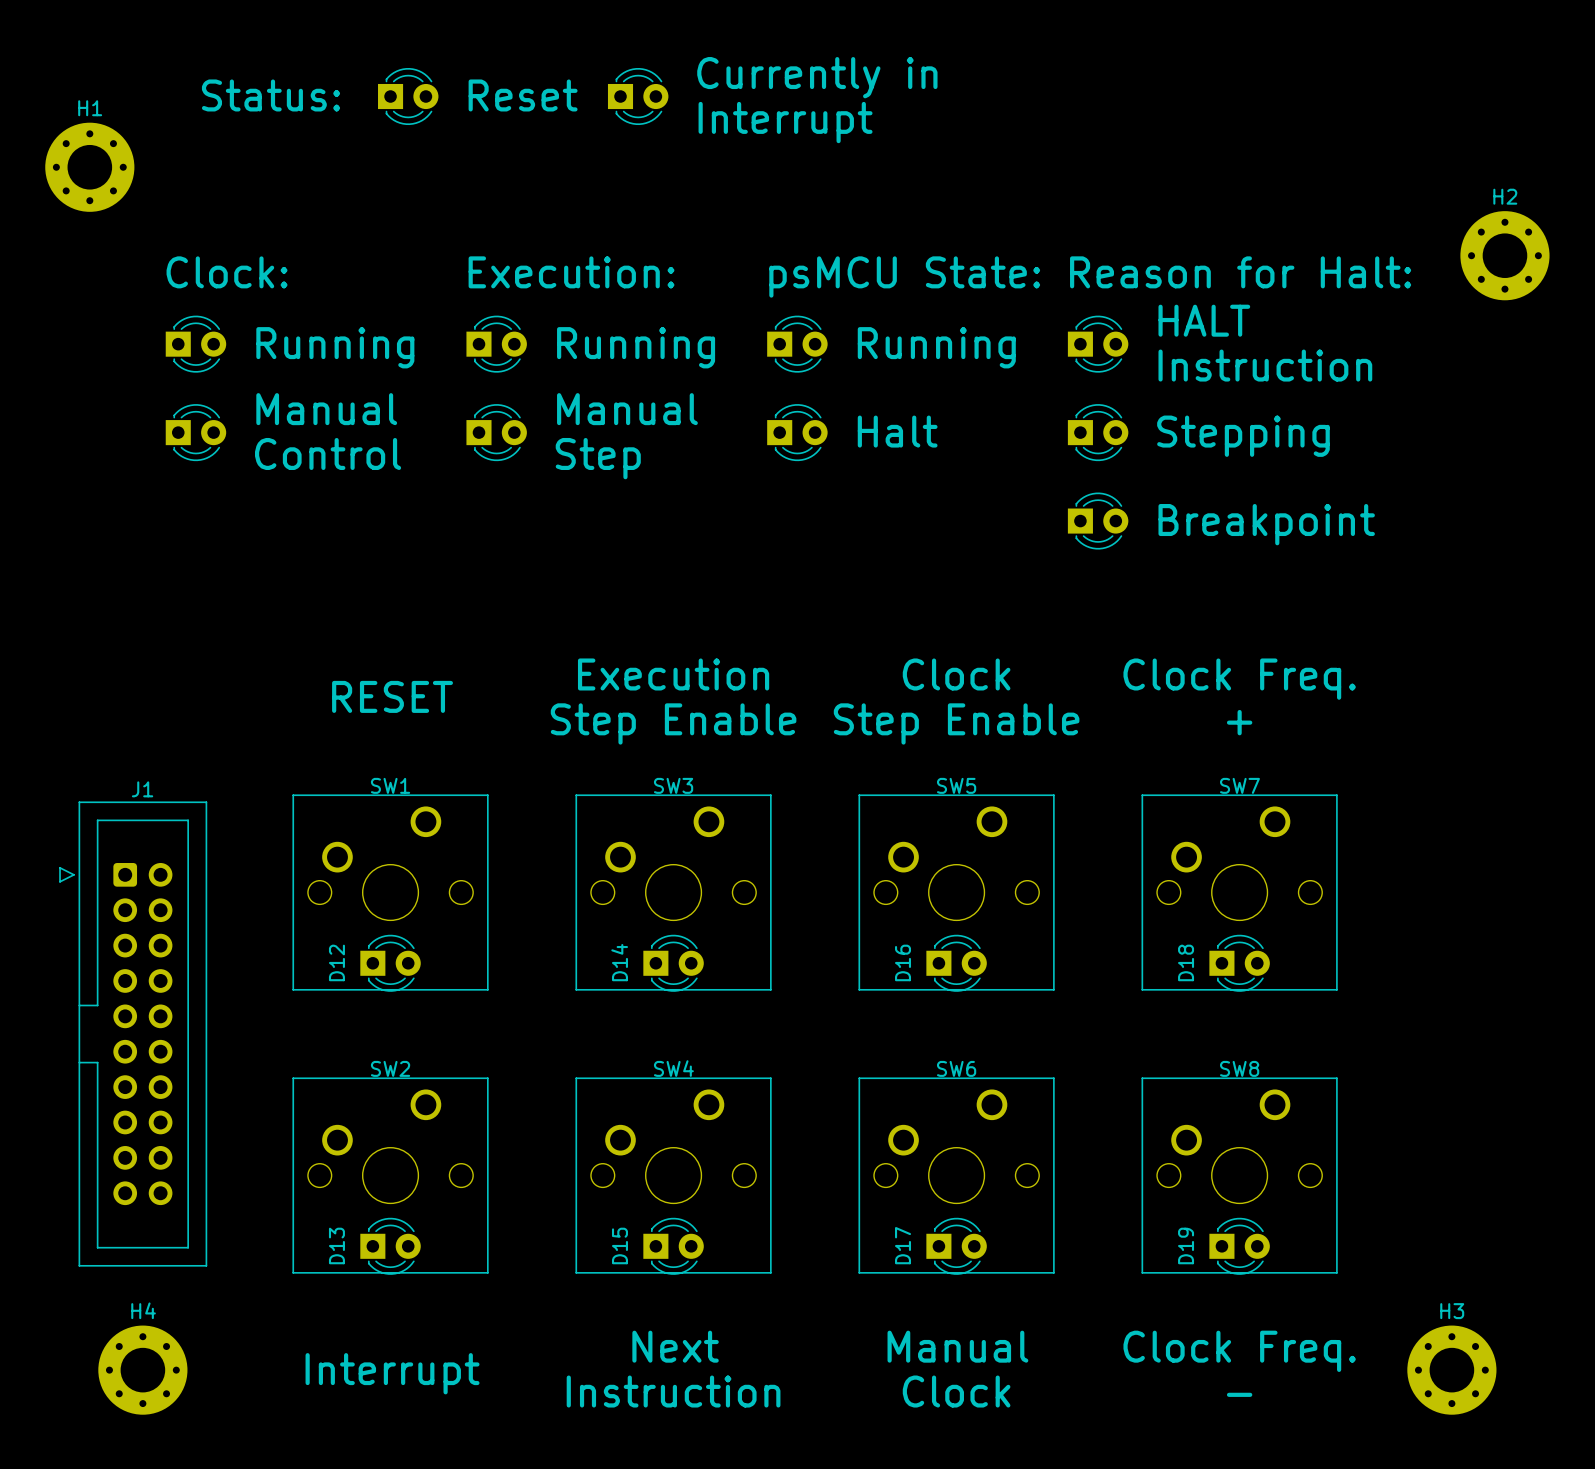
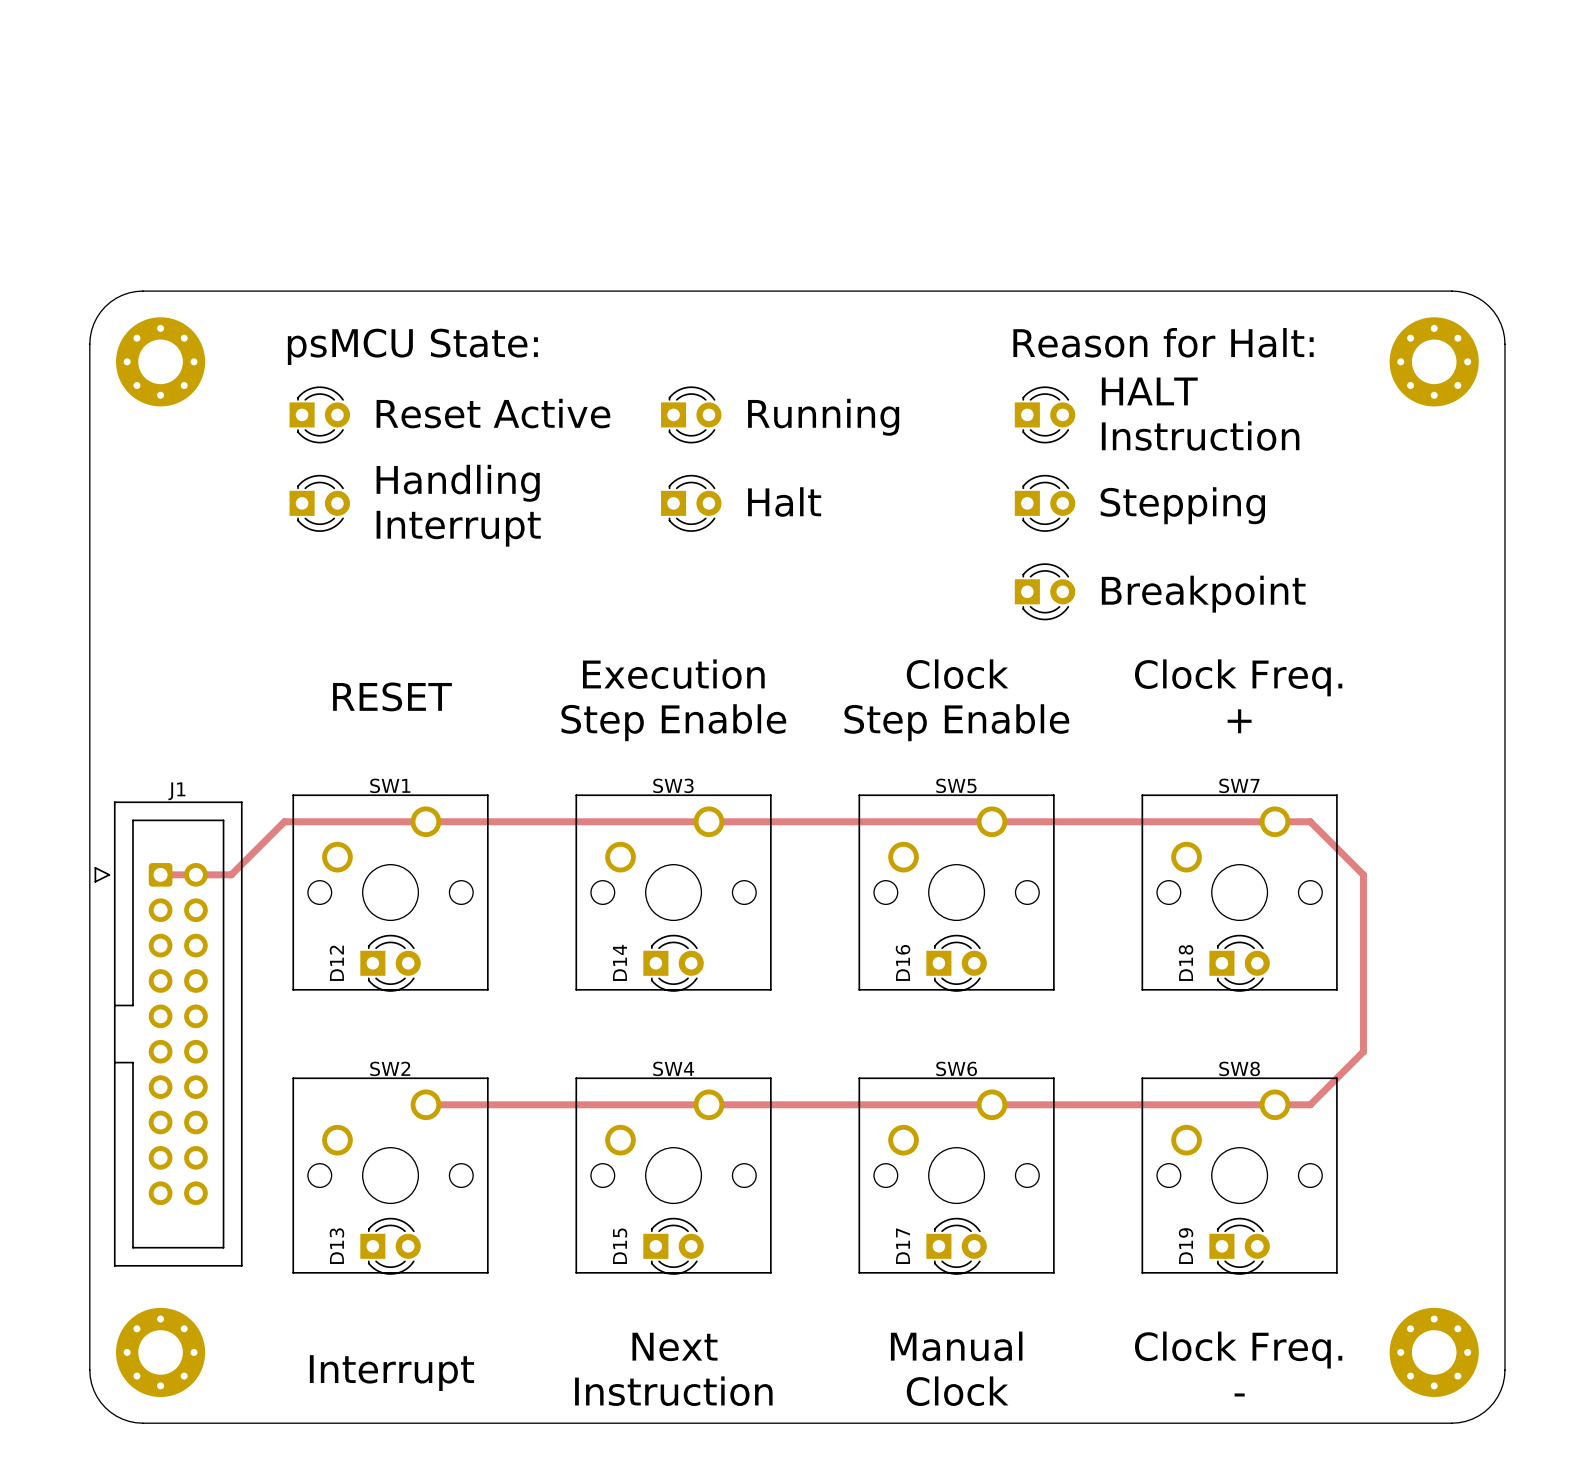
text: Currently in (817, 77) -> none
text: Status: (271, 95) -> none
text: Reset (523, 95) -> none
part: (408, 96) -> none
part: (638, 96) -> none
text: Interrupt (785, 122) -> none
H1: (89, 167) -> none
H2: (1504, 255) -> none
text: Clock: (227, 272) -> none
text: Execution: (571, 272) -> none
text position: Reason for Halt: (1240, 272) -> Reason for Halt: (1163, 342)
text: psMCU State: (904, 277) -> none
board edge: none -> (142, 291) (1451, 291) (1472, 295) (1484, 302) (1497, 317) (1503, 330) (1504, 344) (1504, 1370) (1503, 1383) (1494, 1402) (1484, 1412) (1472, 1419) (1451, 1423) (142, 1423) (122, 1419) (110, 1412) (100, 1402) (93, 1390) (89, 1370) (89, 344) (93, 323) (105, 306) (122, 295) (142, 291)
text position: HALT (1204, 320) -> HALT (1149, 391)
part: (195, 344) -> none
part: (496, 344) -> none
part: (797, 344) -> none
part: (1098, 344) -> none
text: Running (335, 347) -> none
text: none -> psMCU State: (412, 346)
text: Running (636, 347) -> none
text: Running (936, 347) -> none
part: none -> (160, 361)
part: none -> (1434, 361)
text position: Instruction (1265, 365) -> Instruction (1200, 435)
text: Manual (326, 409) -> none
text: Manual (627, 409) -> none
text: none -> Reset Active (493, 413)
part: none -> (319, 414)
part: none -> (691, 414)
part: none -> (1045, 414)
text: none -> Running (823, 417)
text position: Halt (897, 431) -> Halt (784, 502)
part: (195, 432) -> none
part: (496, 432) -> none
part: (797, 432) -> none
part: (1098, 432) -> none
text position: Stepping (1243, 436) -> Stepping (1182, 505)
text: Control (328, 453) -> none
text: Step (598, 458) -> none
text: none -> Handling (458, 483)
part: none -> (319, 503)
part: none -> (691, 503)
part: none -> (1045, 503)
part: (1098, 521) -> none
text position: Breakpoint (1266, 524) -> Breakpoint (1203, 594)
text: none -> Interrupt (458, 528)
part: none -> (1045, 591)
track: none -> (160, 874) (231, 874) (284, 821) (1310, 821) (1363, 874) (1363, 1051) (1310, 1104) (425, 1104)
J1 position: (133, 1034) -> (168, 1034)
part: none -> (160, 1352)
part: none -> (1434, 1352)
H4: (142, 1370) -> none
H3: (1451, 1370) -> none

